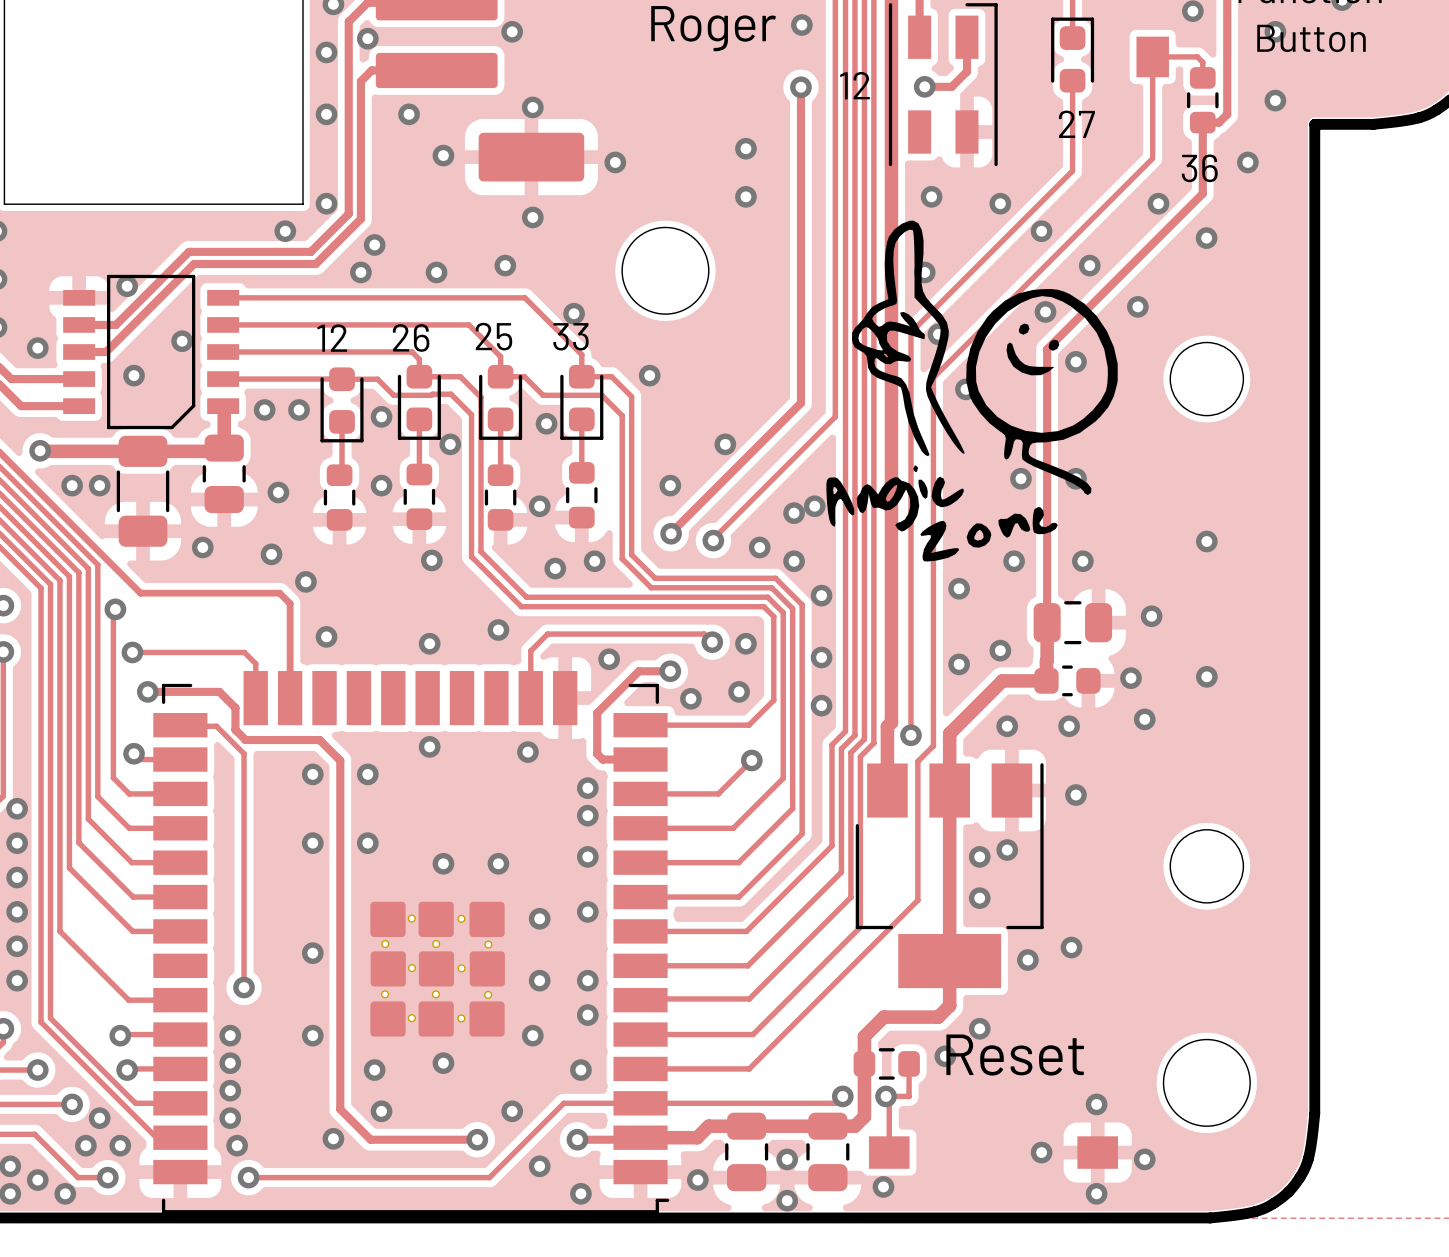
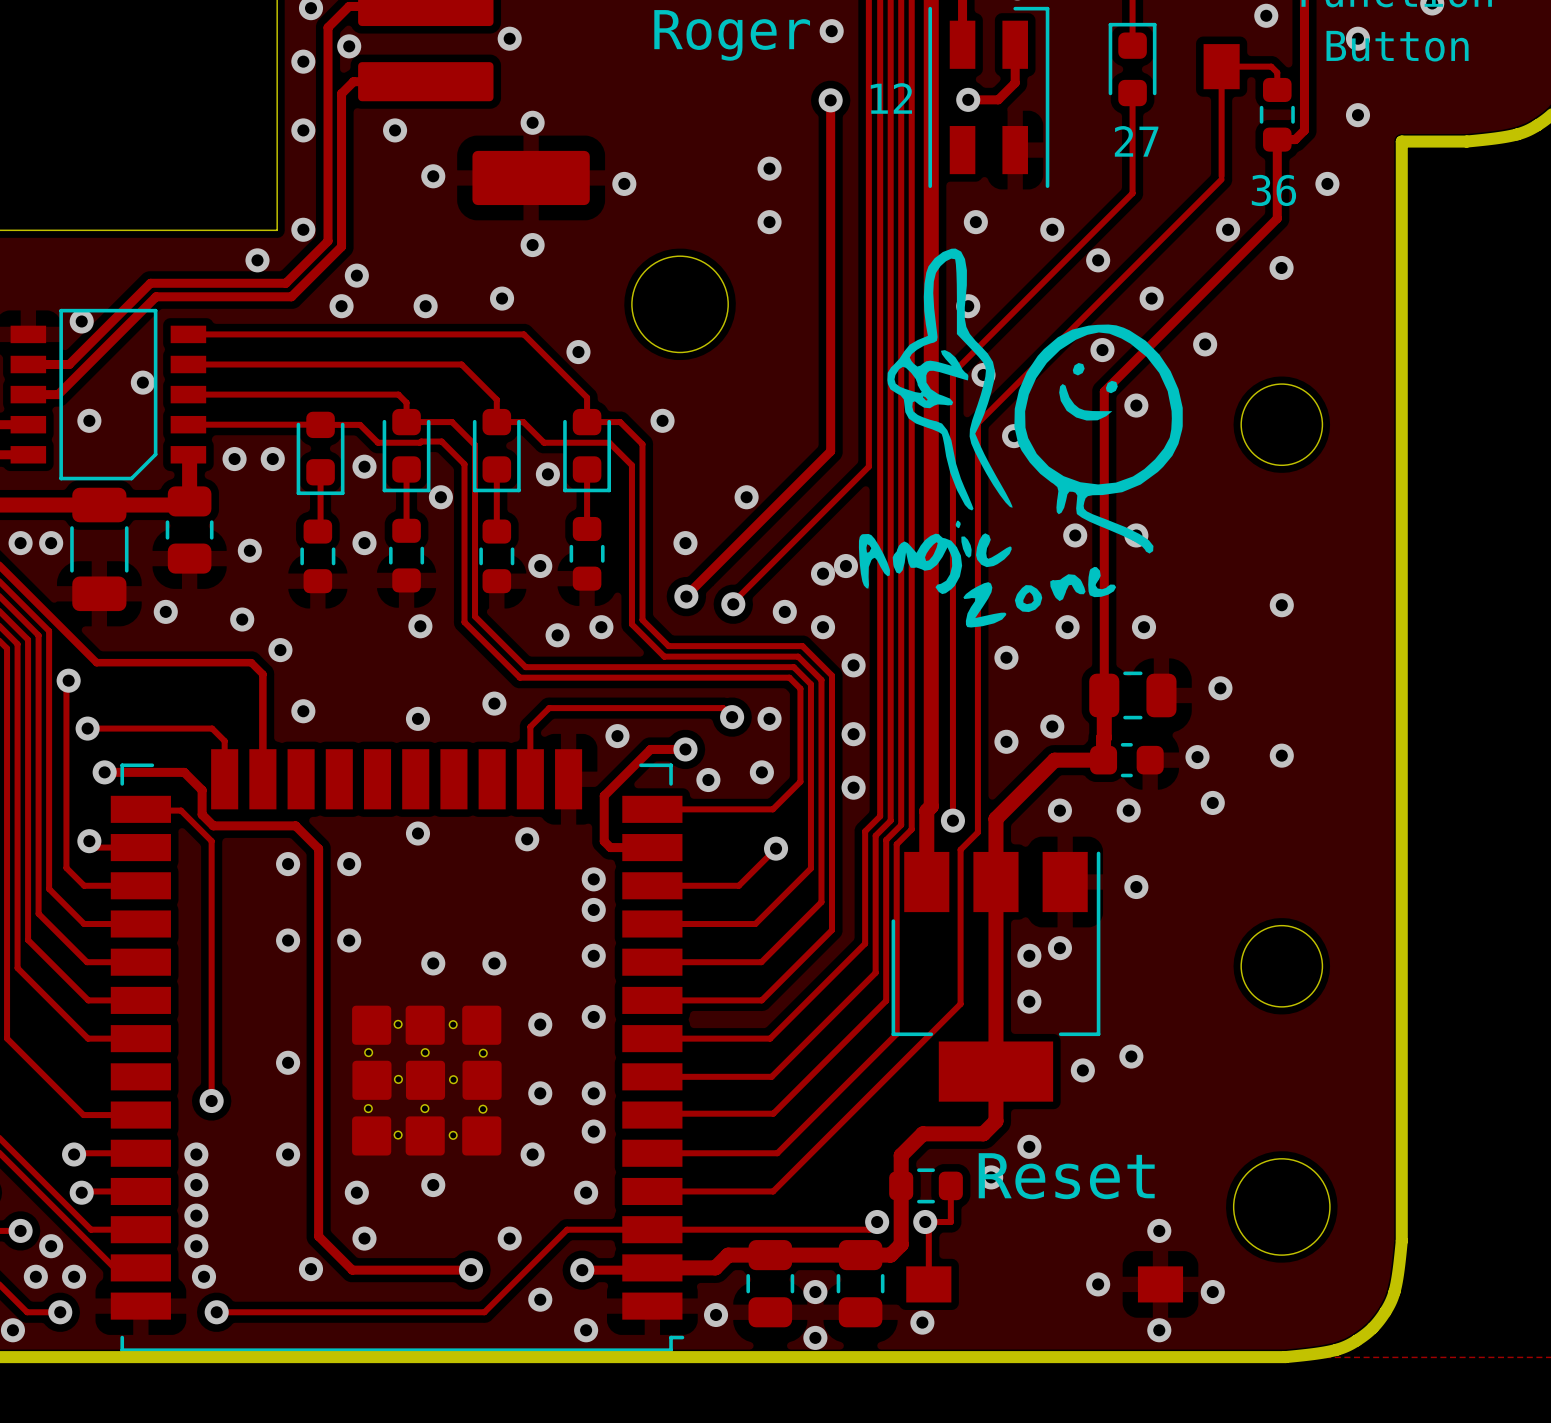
text: 25 (493, 336) -> none
text: 33 (570, 336) -> none
text: 26 (411, 337) -> none
text: 12 (332, 338) -> none

